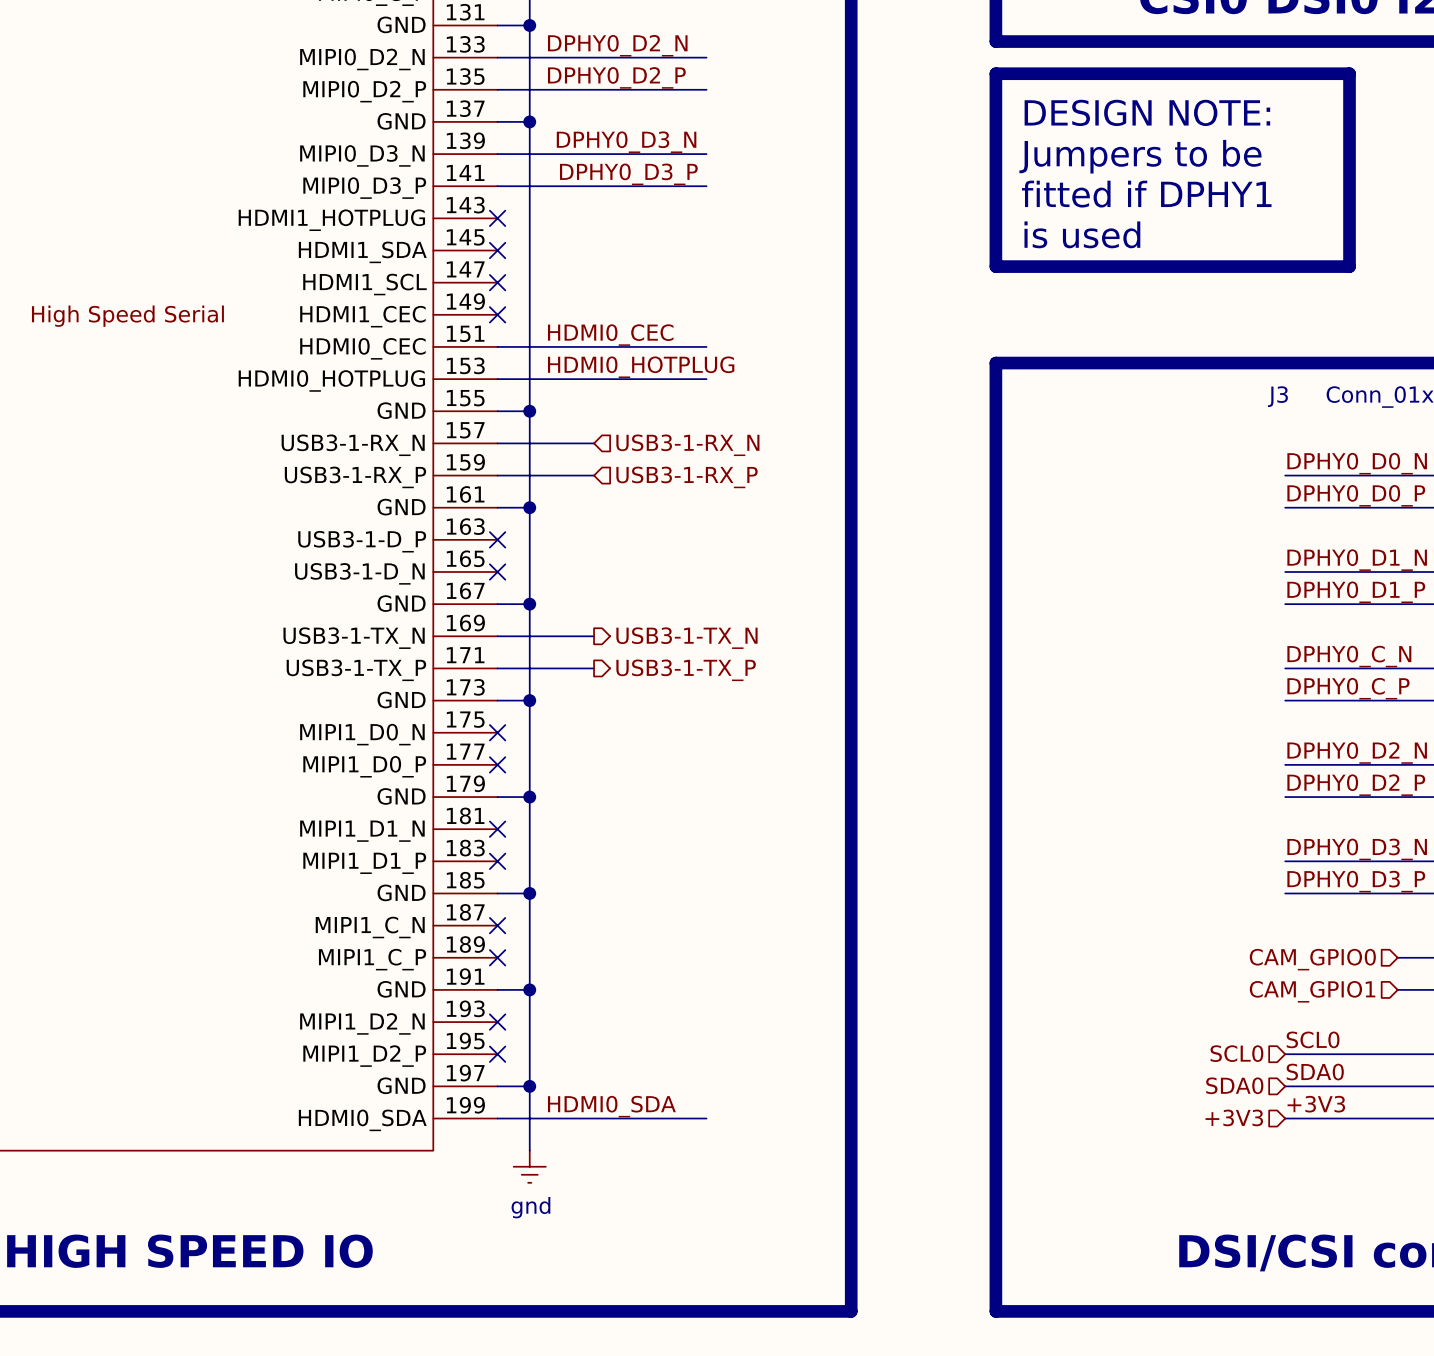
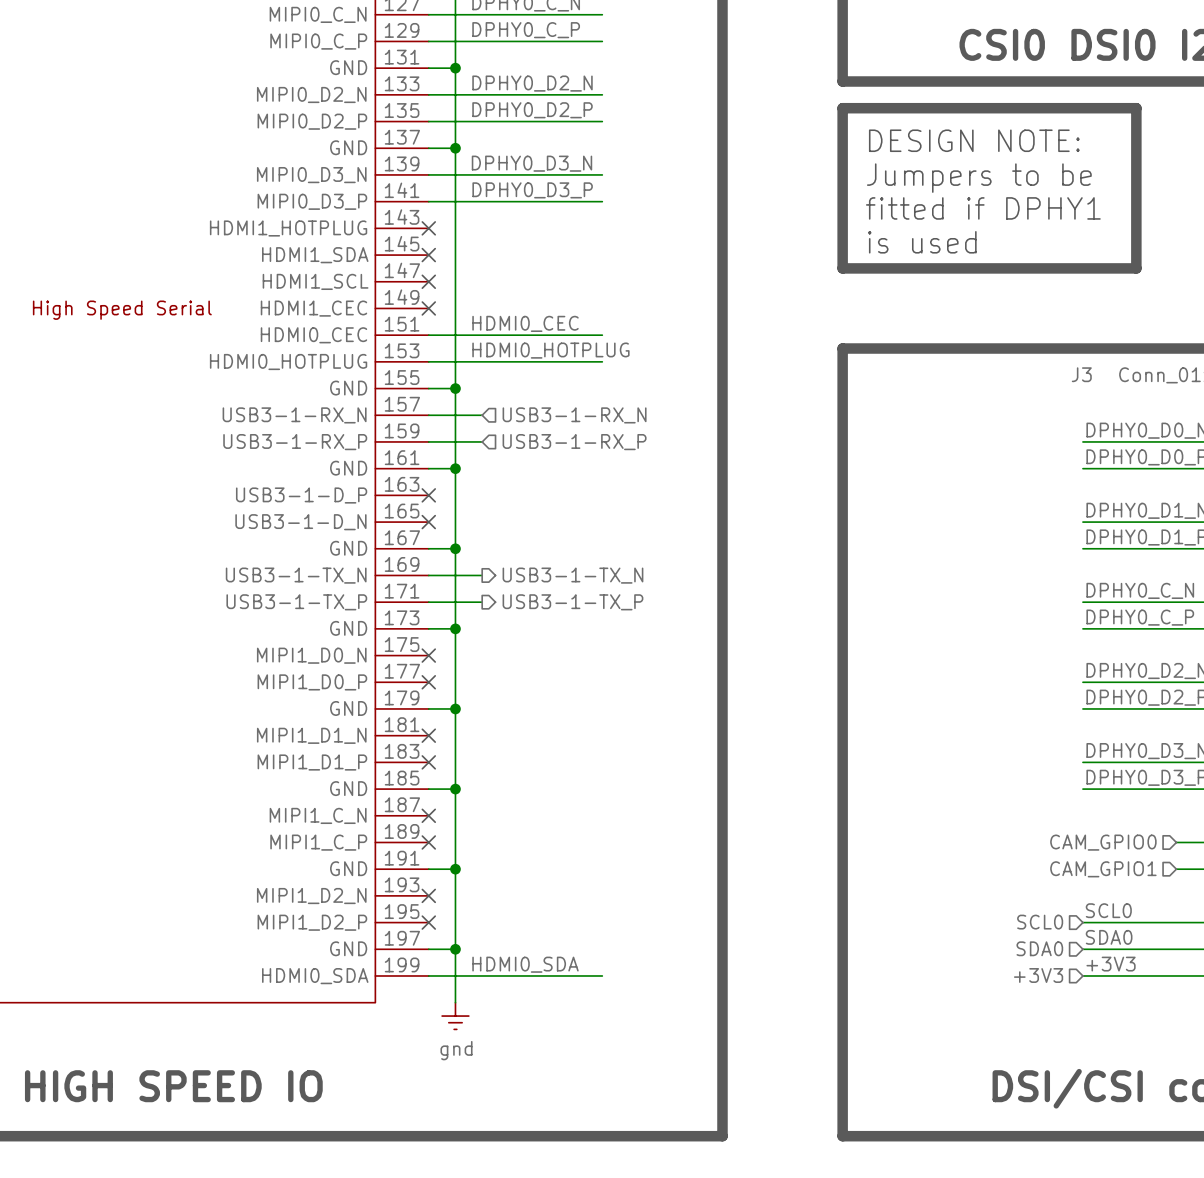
wire: (561, 443) (594, 443) -> none
hierarchical label position: USB3-1-RX_N (687, 445) -> USB3-1-RX_N (574, 415)
wire: (561, 475) (594, 475) -> none
hierarchical label position: USB3-1-RX_P (687, 477) -> USB3-1-RX_P (574, 442)
wire: (561, 636) (594, 636) -> none
hierarchical label position: USB3-1-TX_N (686, 638) -> USB3-1-TX_N (572, 575)
wire: (561, 668) (594, 668) -> none
hierarchical label position: USB3-1-TX_P (686, 670) -> USB3-1-TX_P (572, 602)

